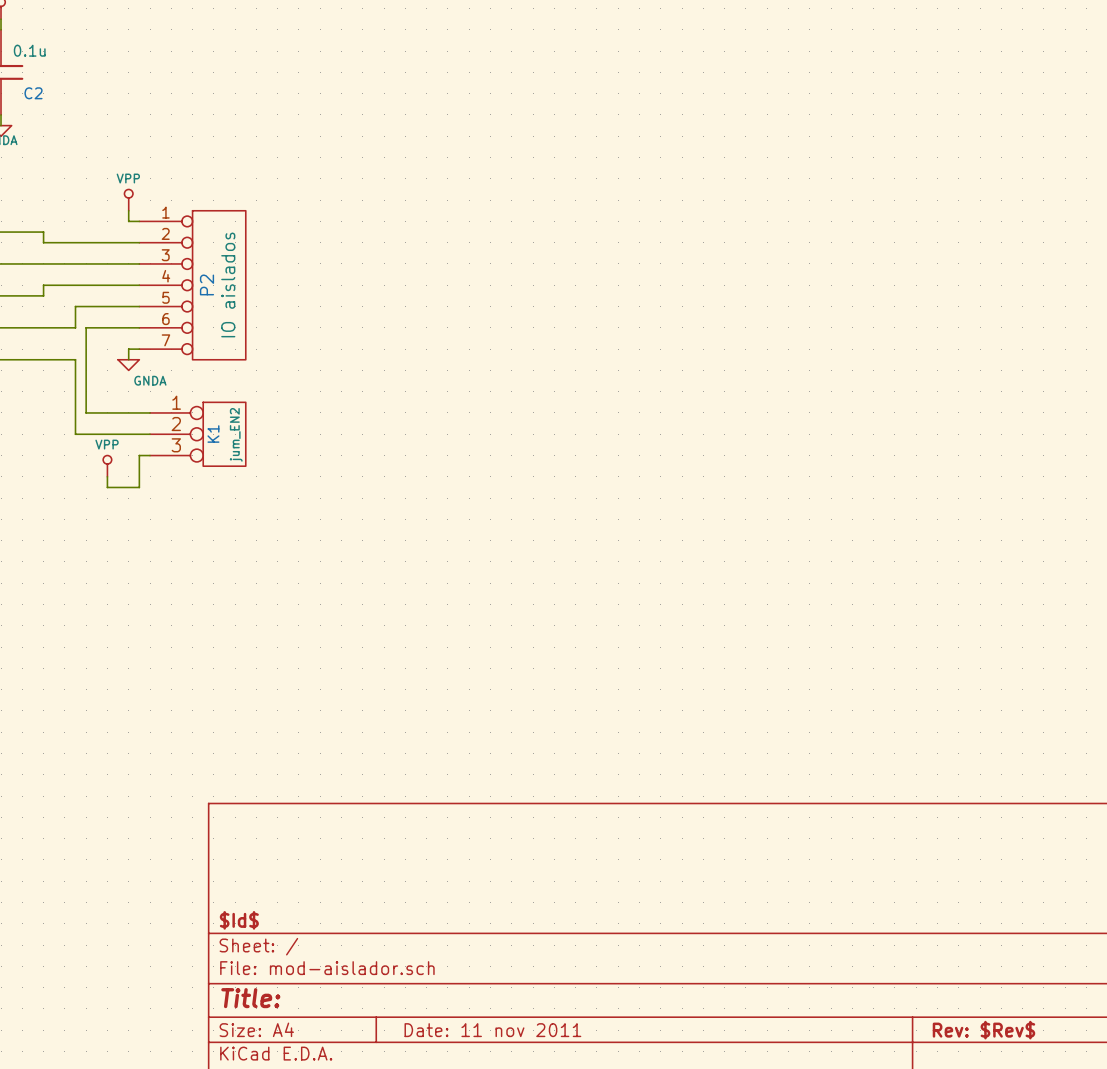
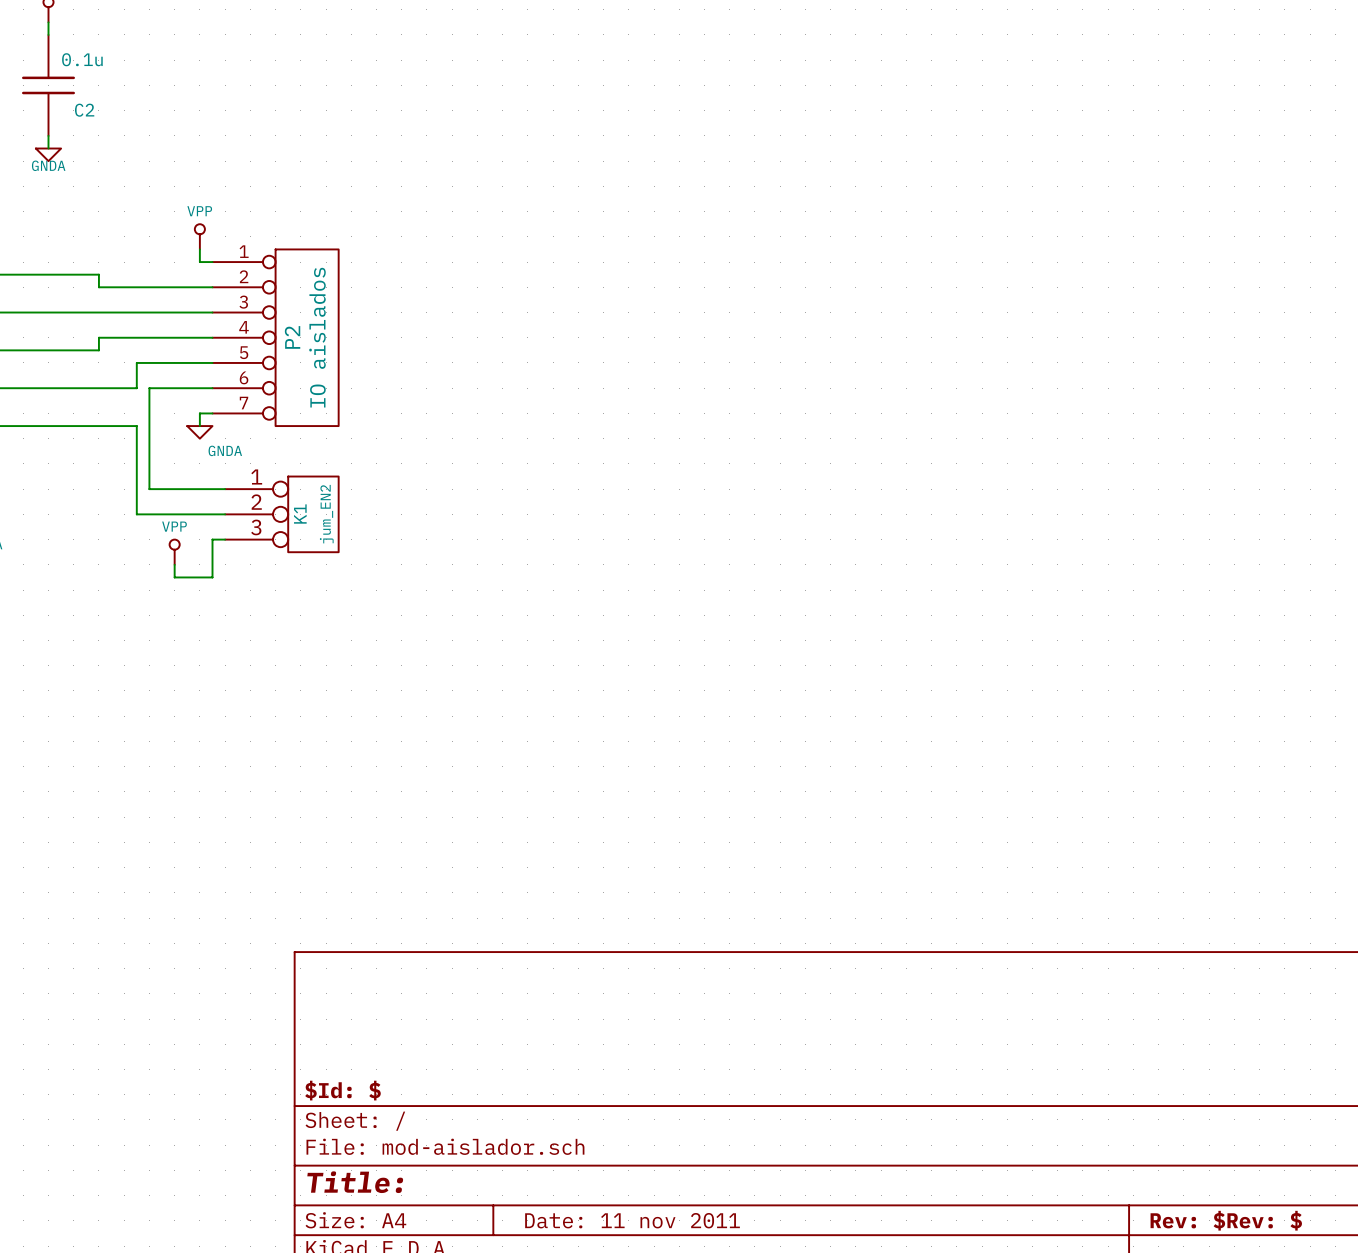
title block: $Id$ (239, 920) -> $Id: $ (342, 1090)
title block: Rev: $Rev$ (983, 1030) -> Rev: $Rev: $ (1226, 1220)

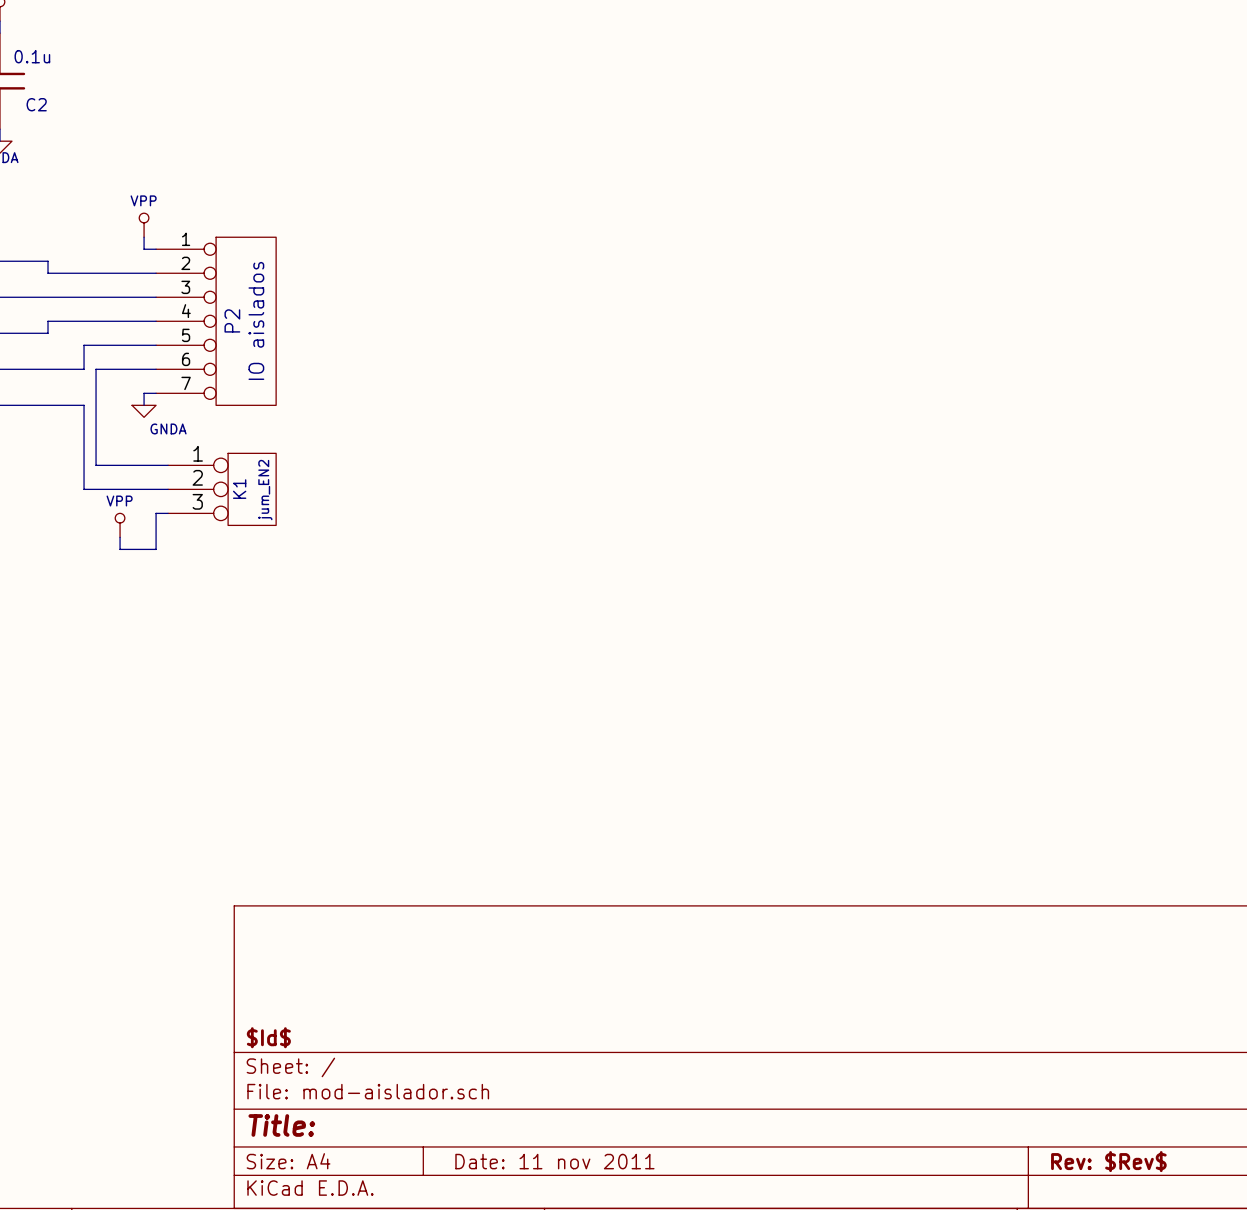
title block: $Id: $ (342, 1090) -> $Id$ (268, 1037)
title block: Rev: $Rev: $ (1226, 1220) -> Rev: $Rev$ (1108, 1161)

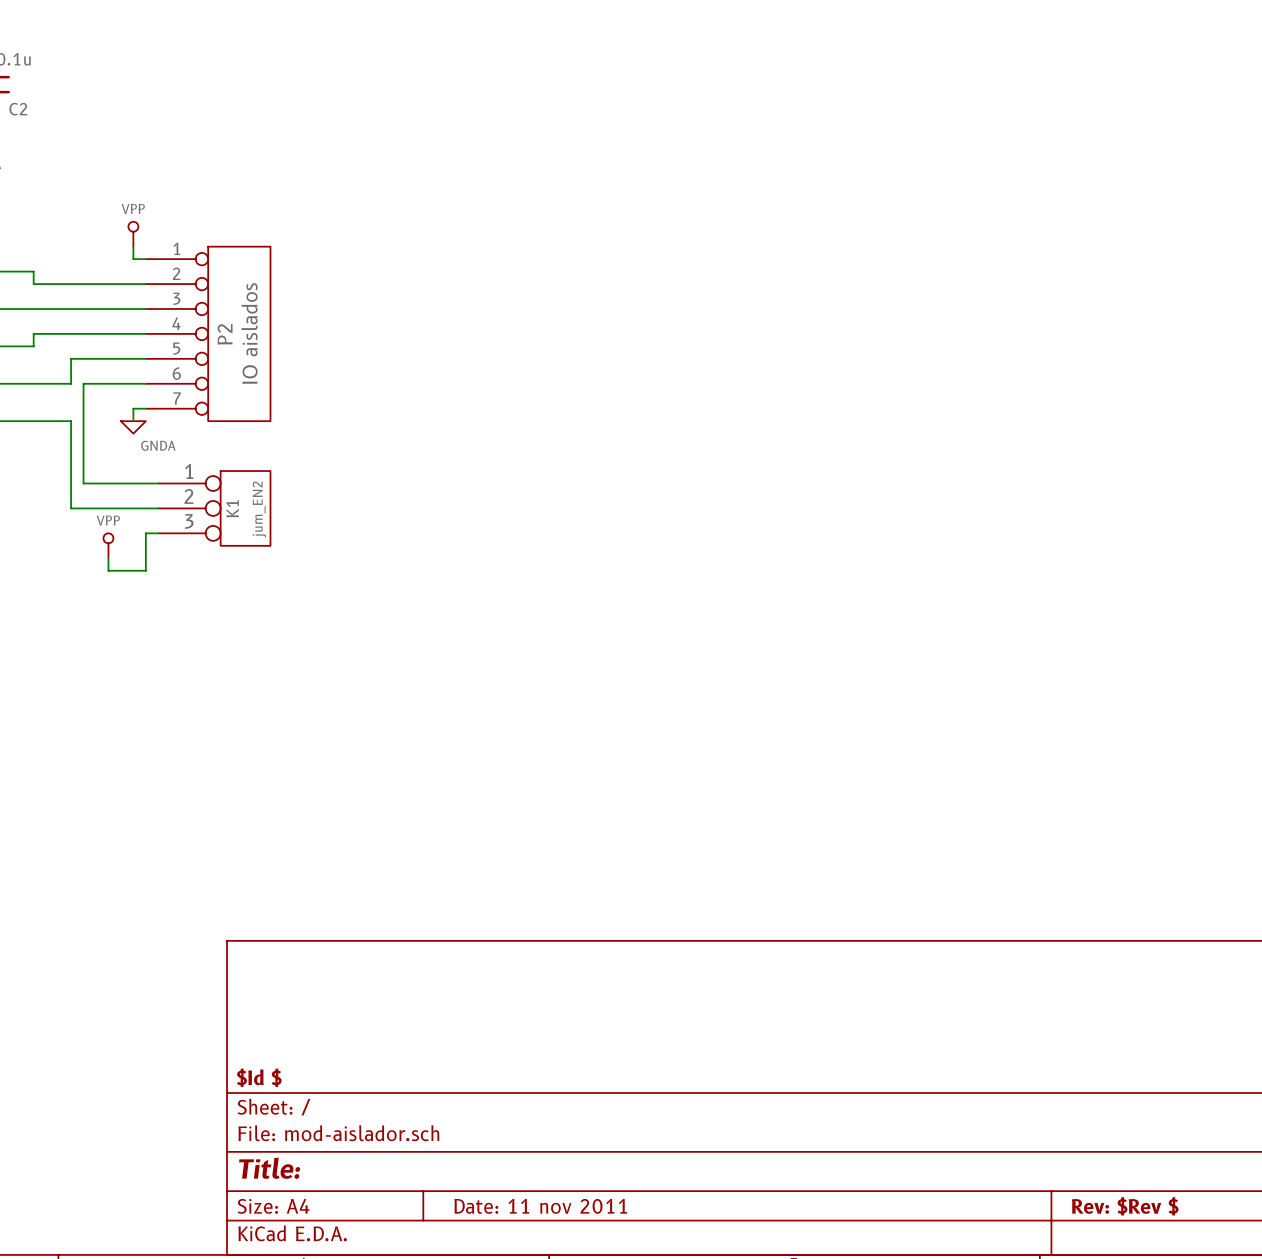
title block: $Id$ (268, 1037) -> $Id $ (259, 1077)
title block: Rev: $Rev$ (1108, 1161) -> Rev: $Rev $ (1125, 1206)

